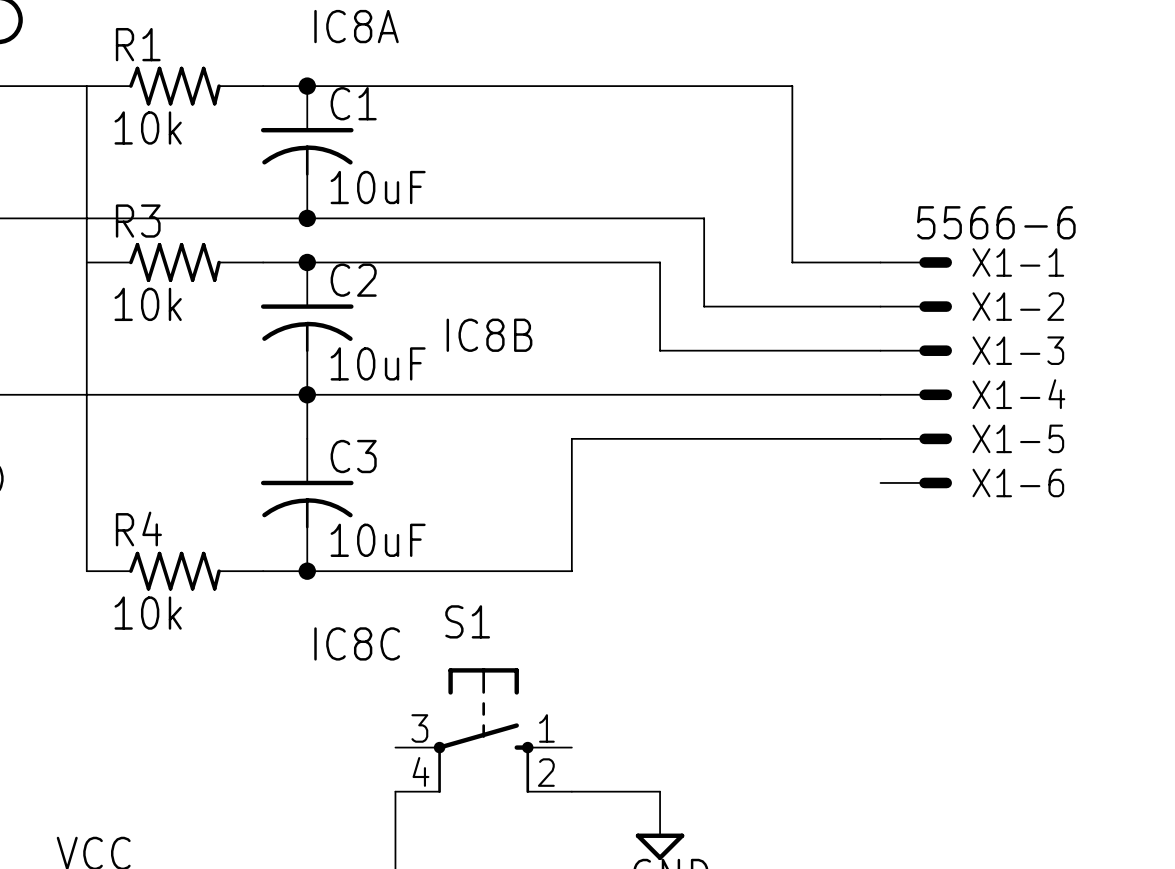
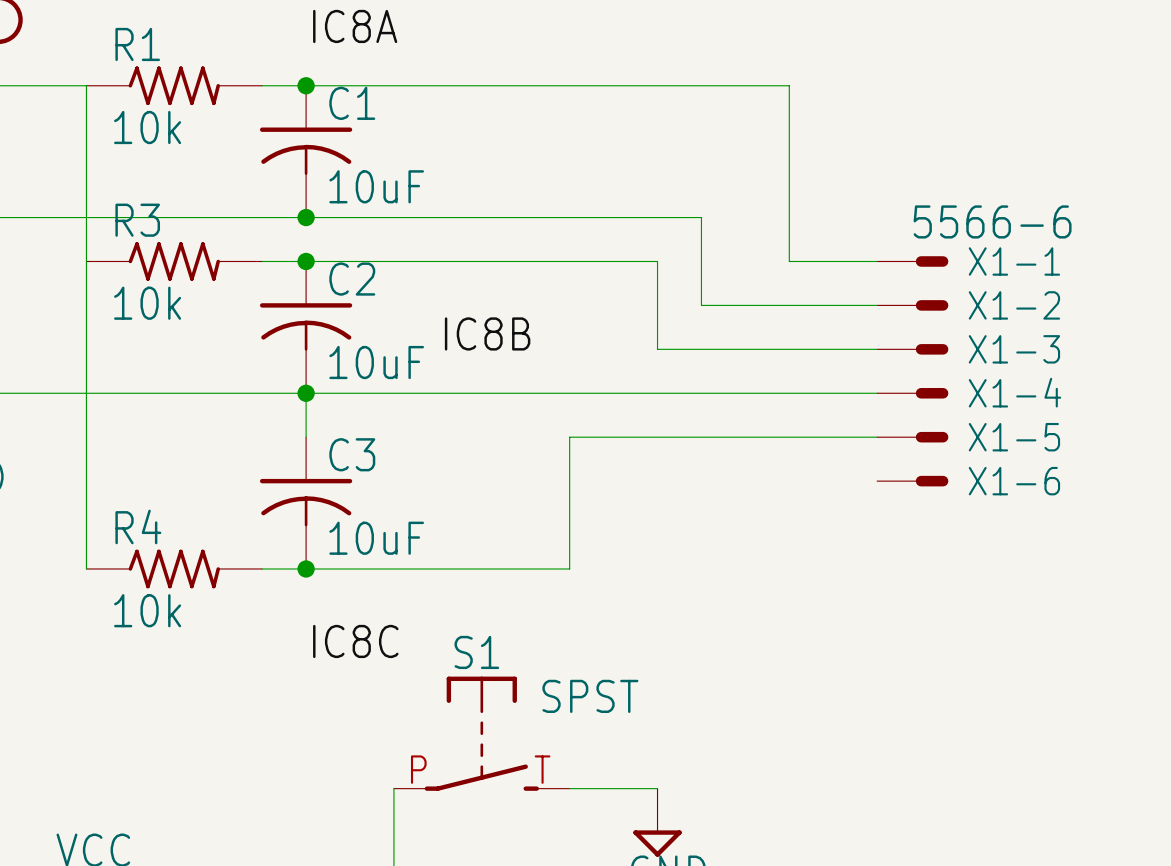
S1 symbol: [395, 668, 572, 793] -> [393, 676, 570, 791]
S1 value: none -> SPST (590, 696)

